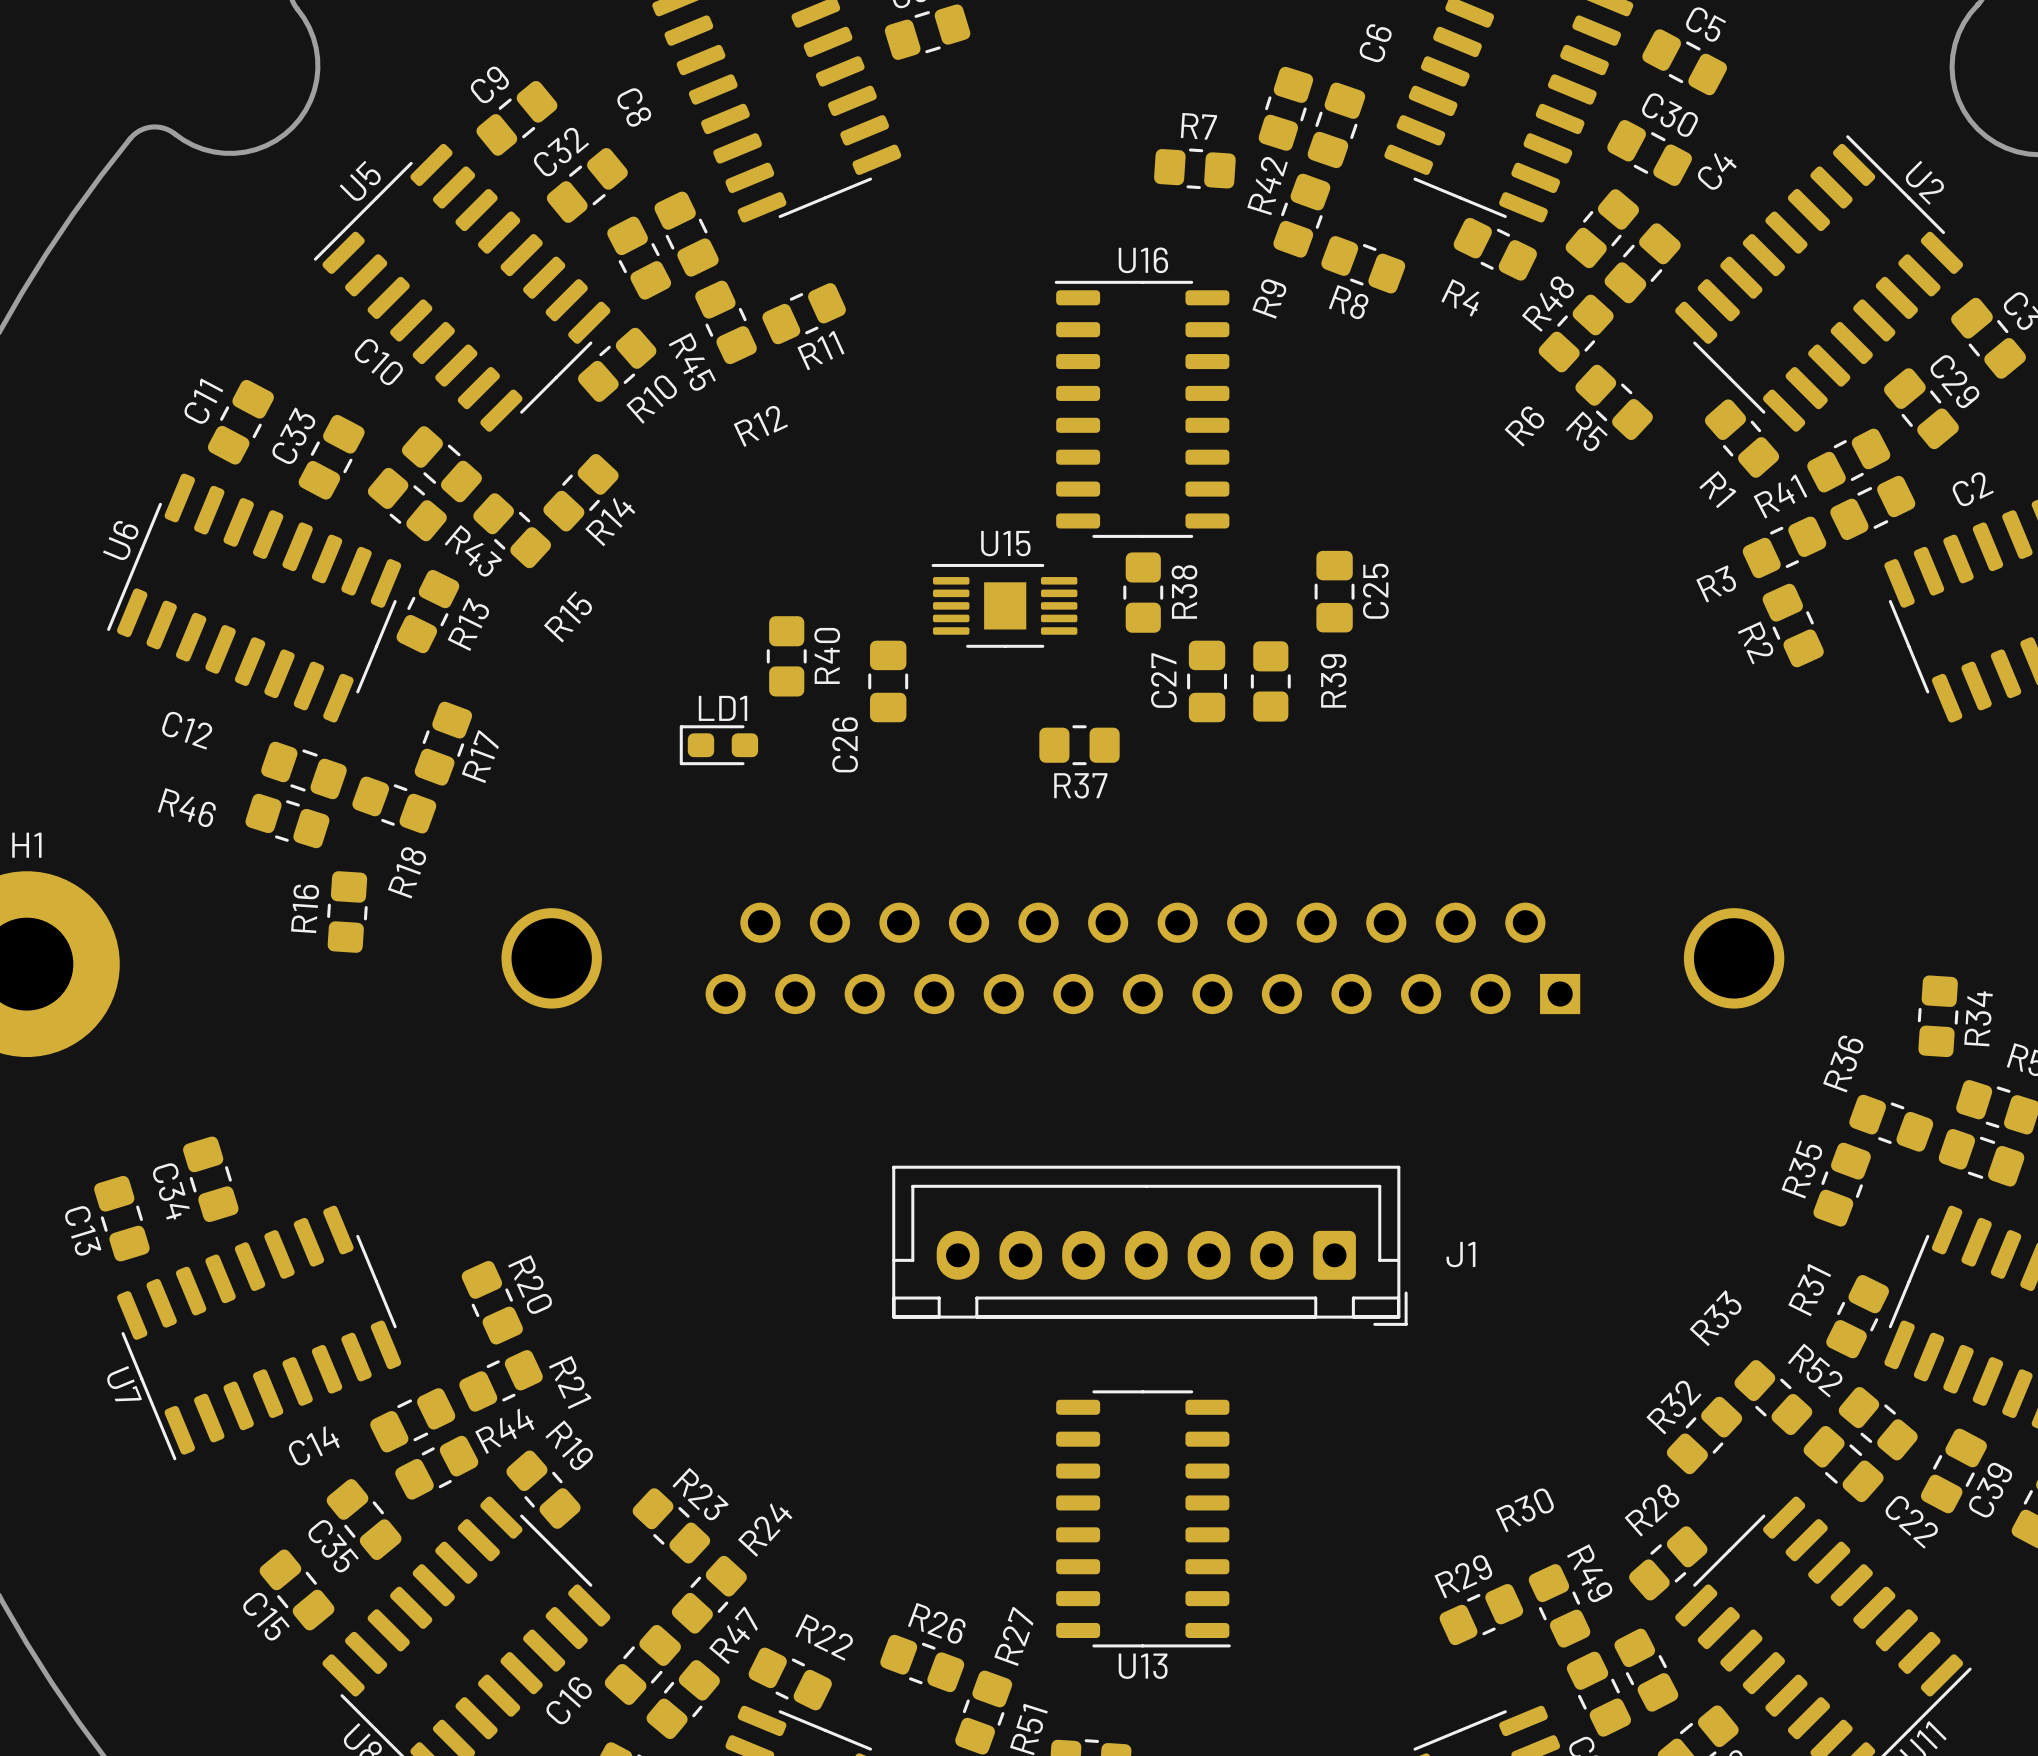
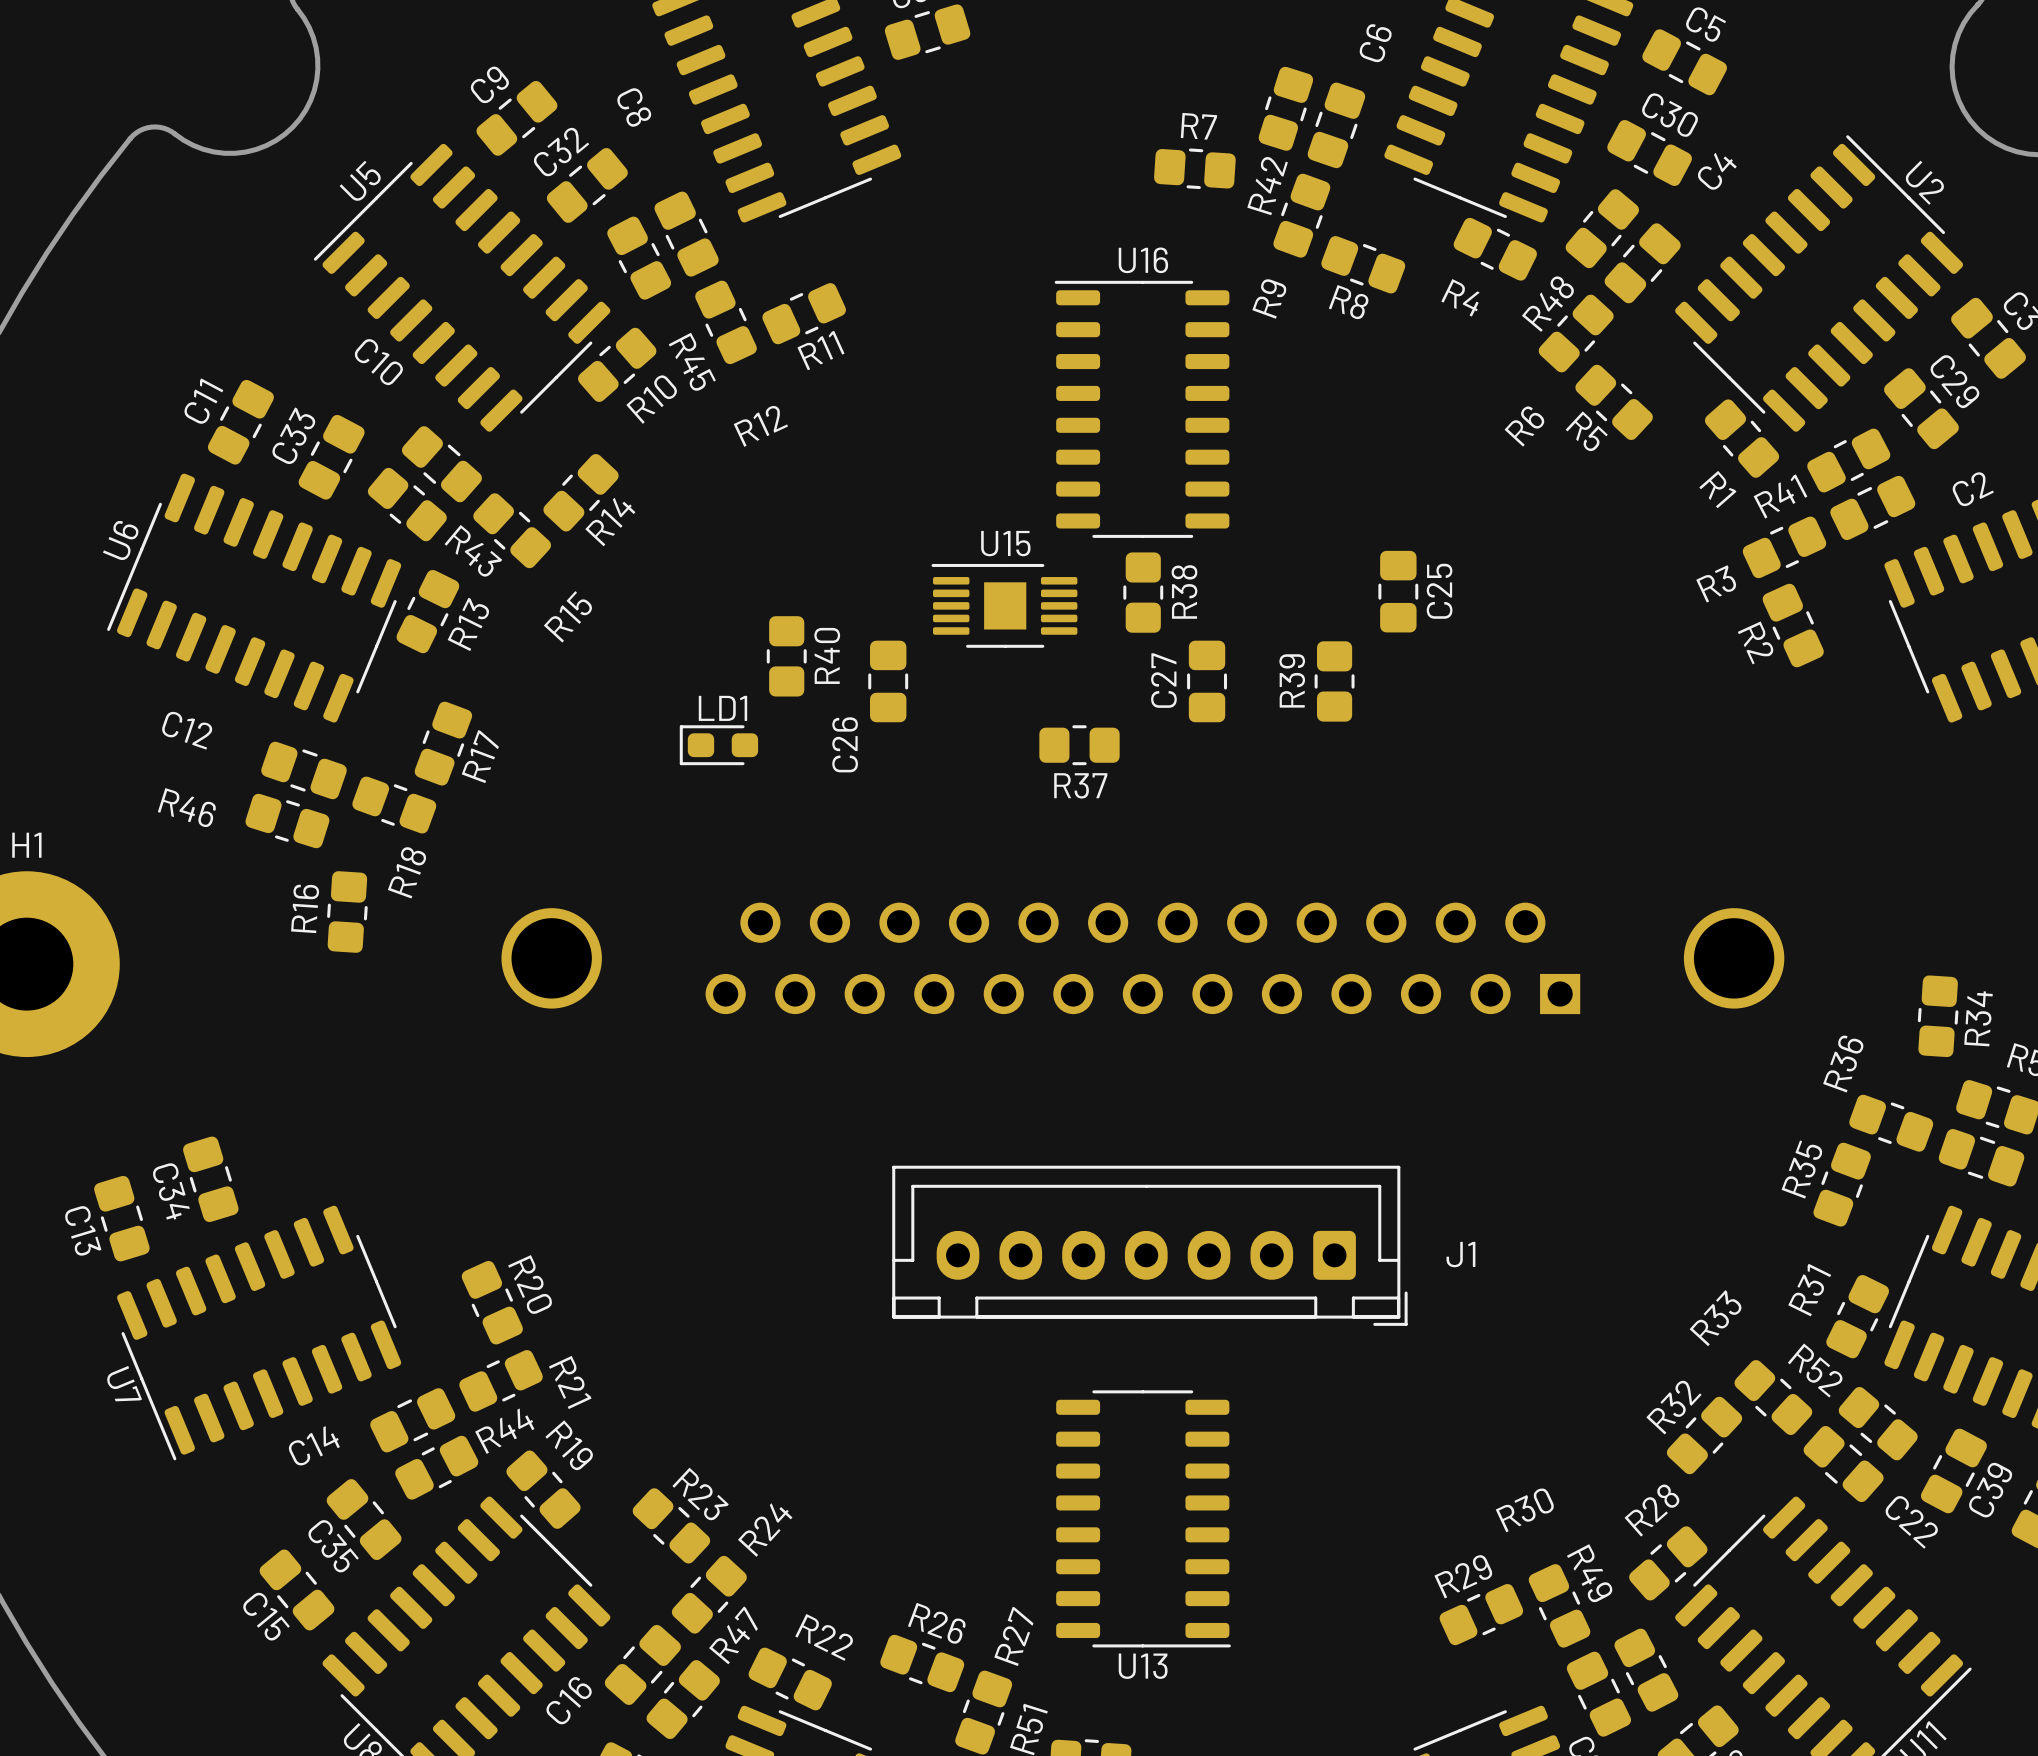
C25 position: (1334, 591) -> (1398, 591)
R39 name position: R39 (1333, 680) -> R39 (1292, 680)
R39 position: (1270, 681) -> (1334, 681)

